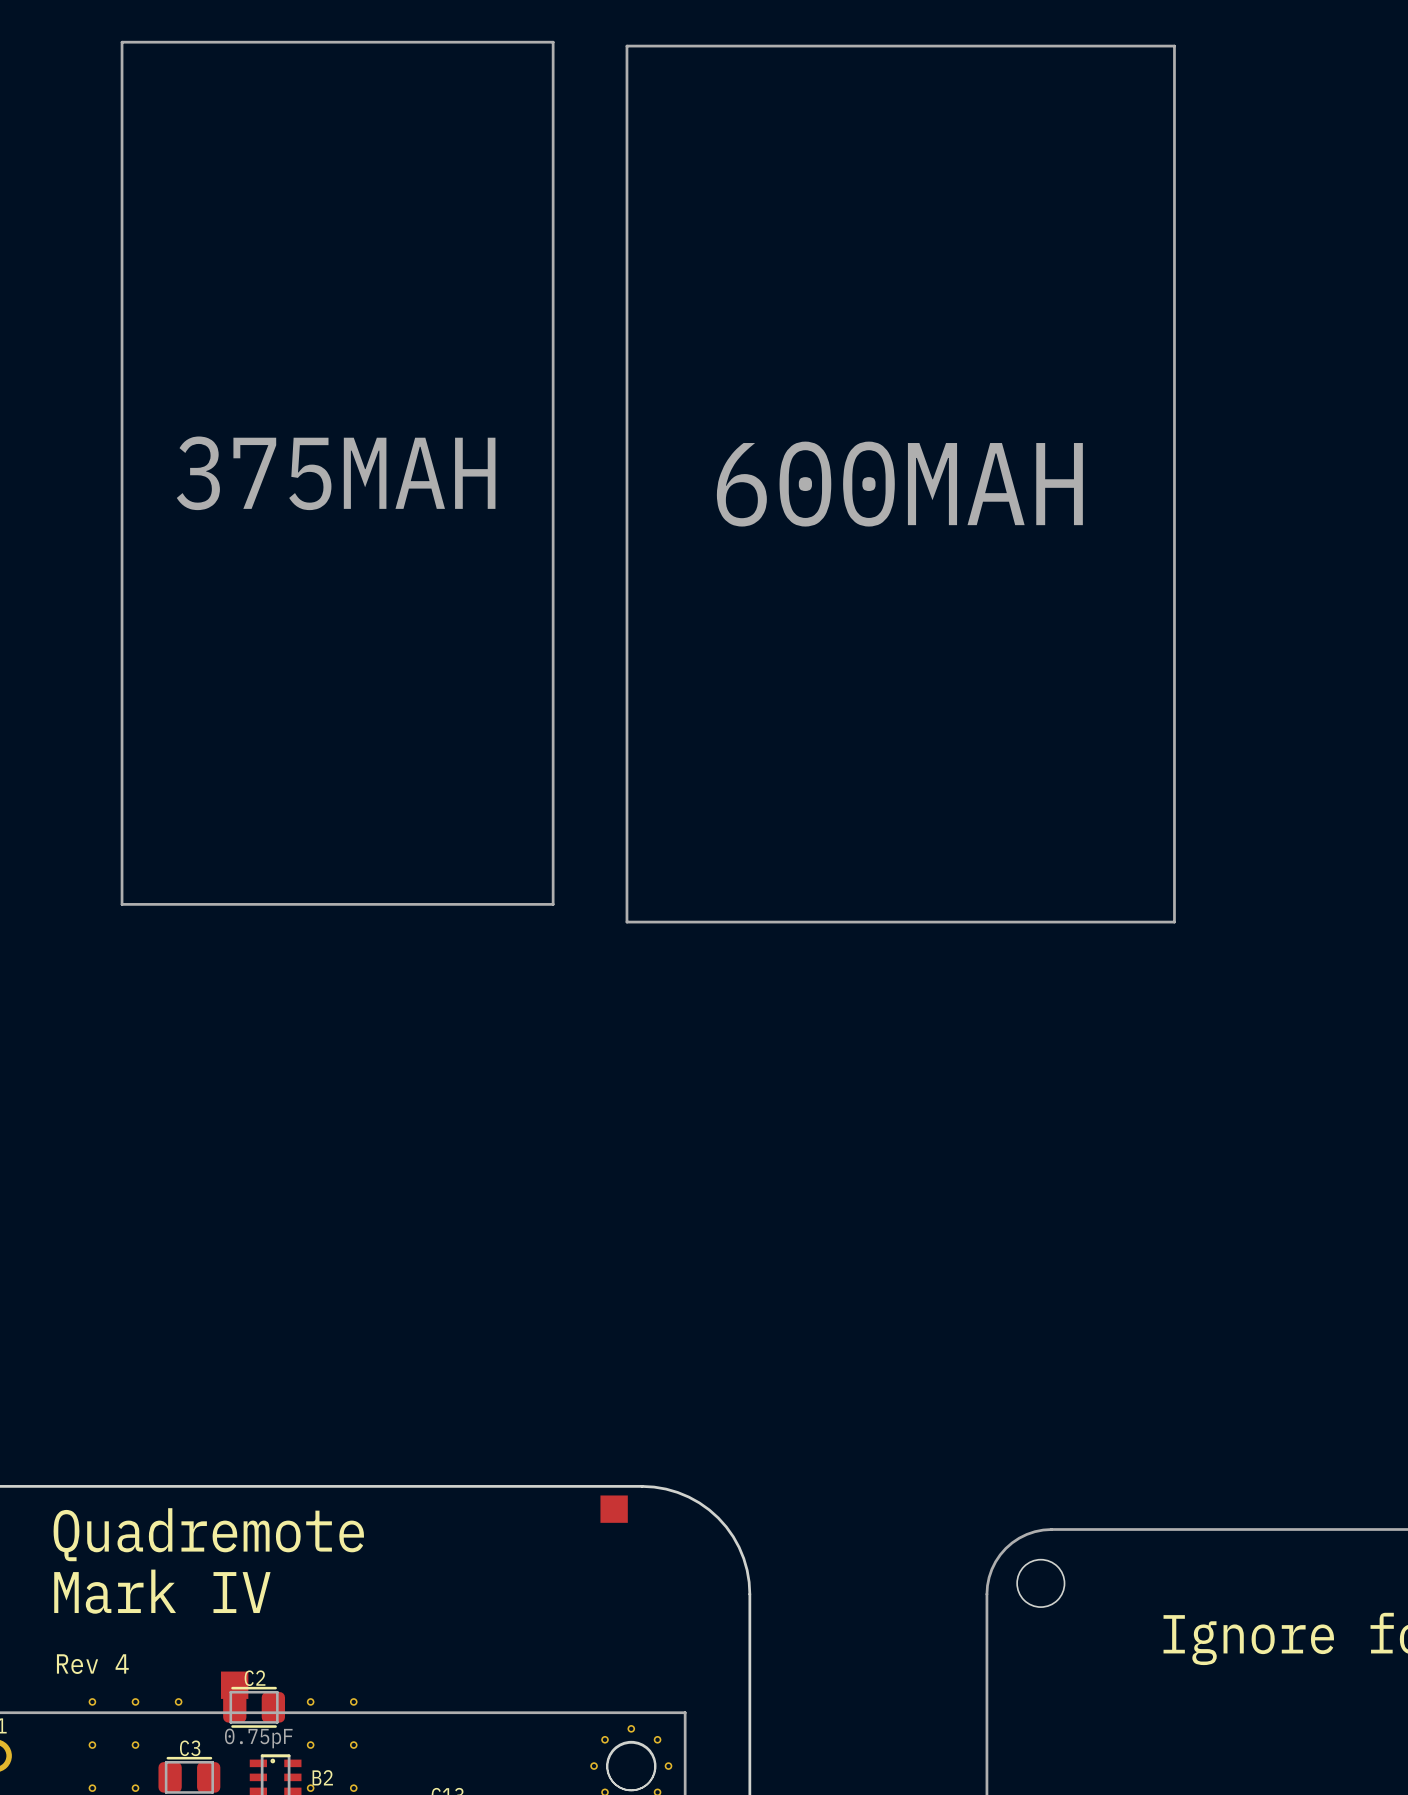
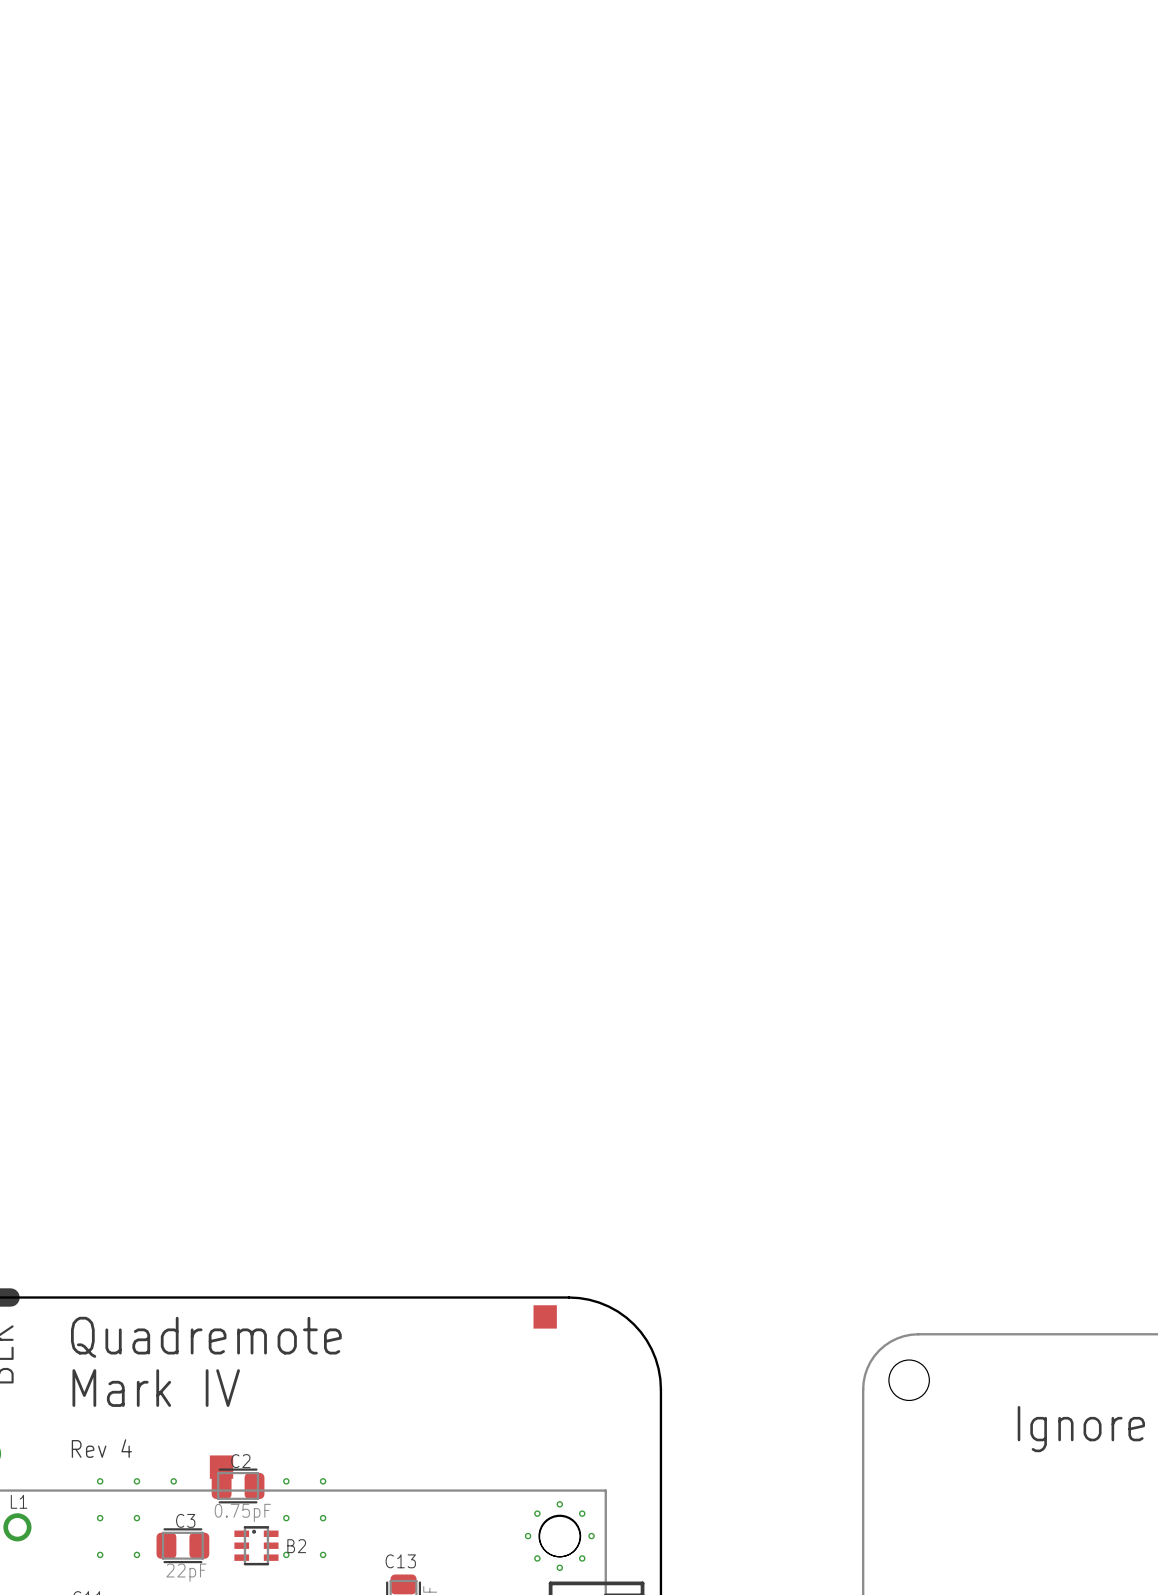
drawing: [120, 40, 555, 906] -> none
drawing: [625, 44, 1176, 924] -> none

